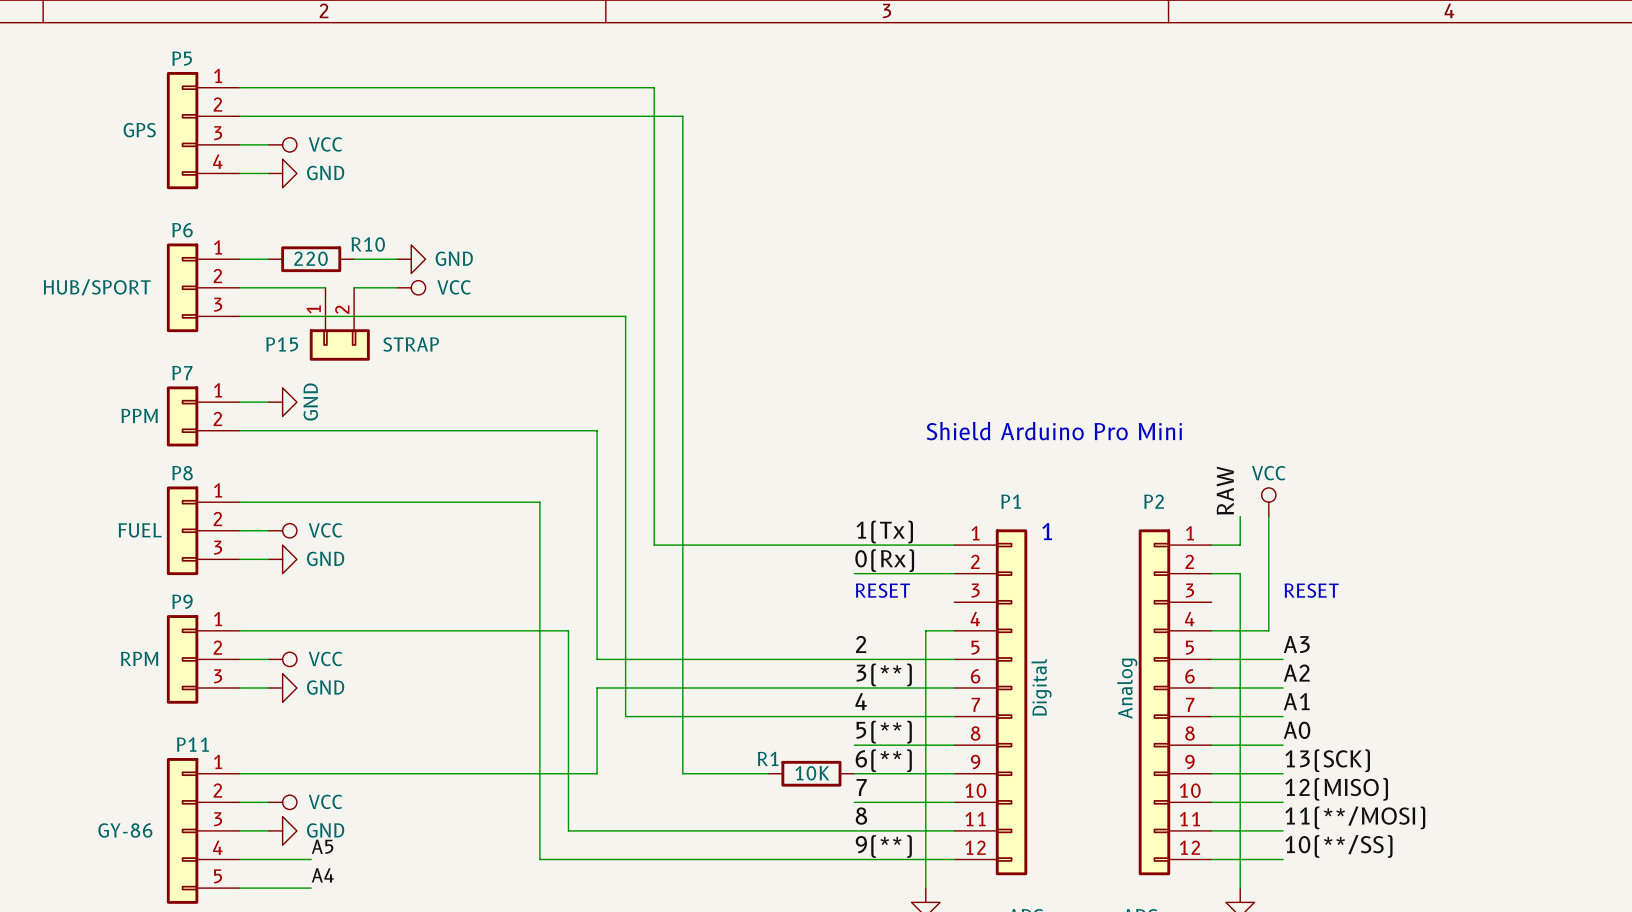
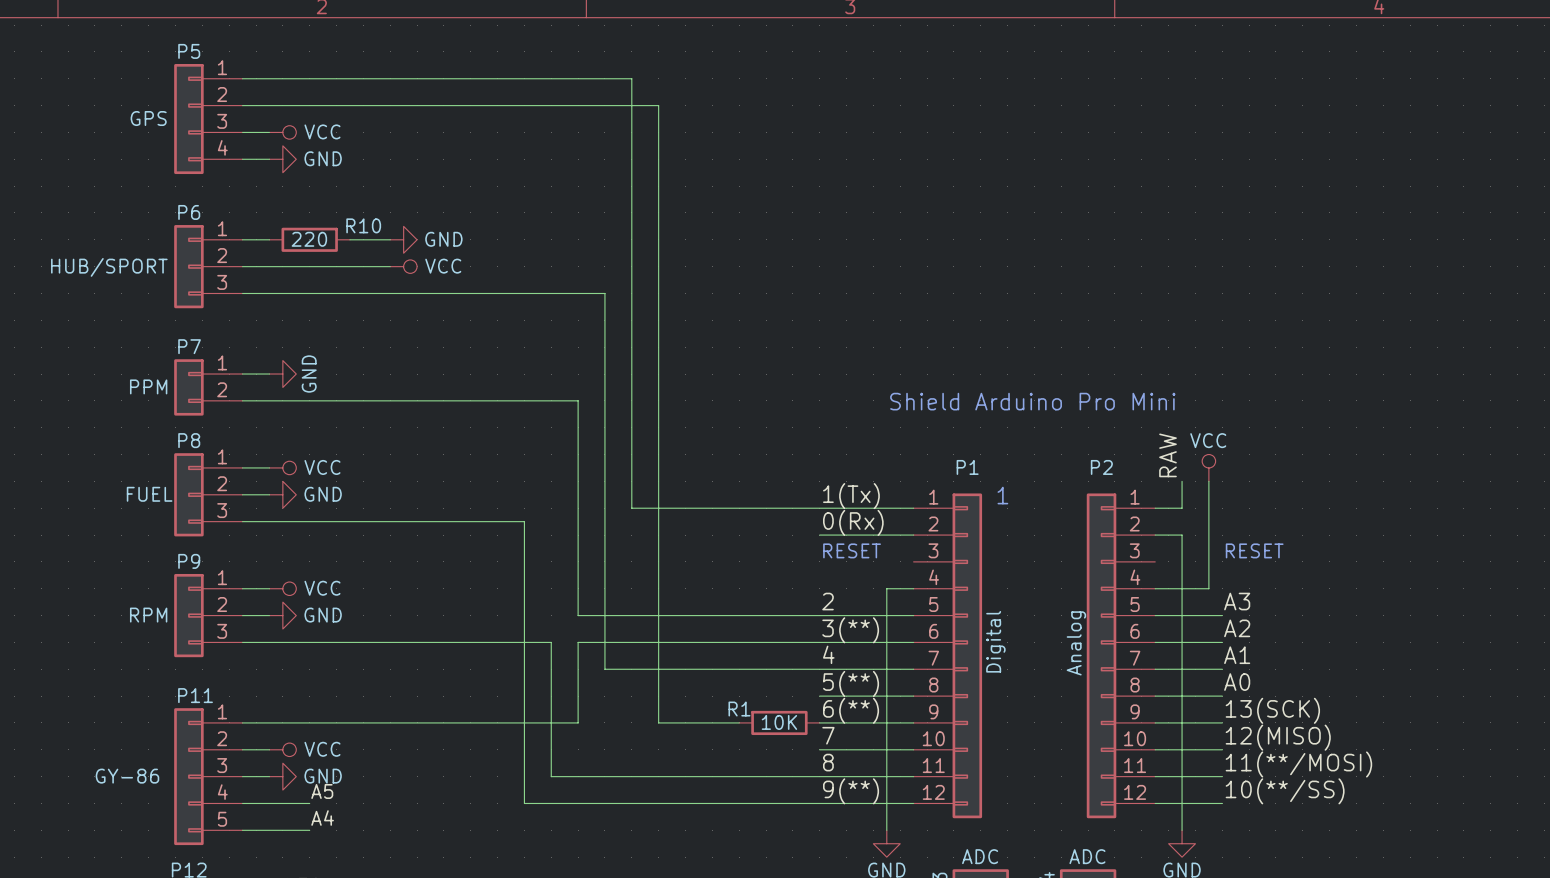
wire: none -> (323, 266) (349, 266)
P15: STRAP (339, 324) -> none
wire: (268, 502) (539, 502) (539, 559) -> (269, 521) (524, 521)
power symbol: none -> VCC (282, 467)
power symbol: VCC (282, 530) -> GND (282, 494)
power symbol: GND (282, 559) -> none
wire: (268, 630) (568, 630) (568, 688) -> (269, 642) (551, 642)
power symbol: none -> VCC (282, 588)
power symbol: VCC (282, 659) -> GND (282, 615)
power symbol: GND (282, 688) -> none

